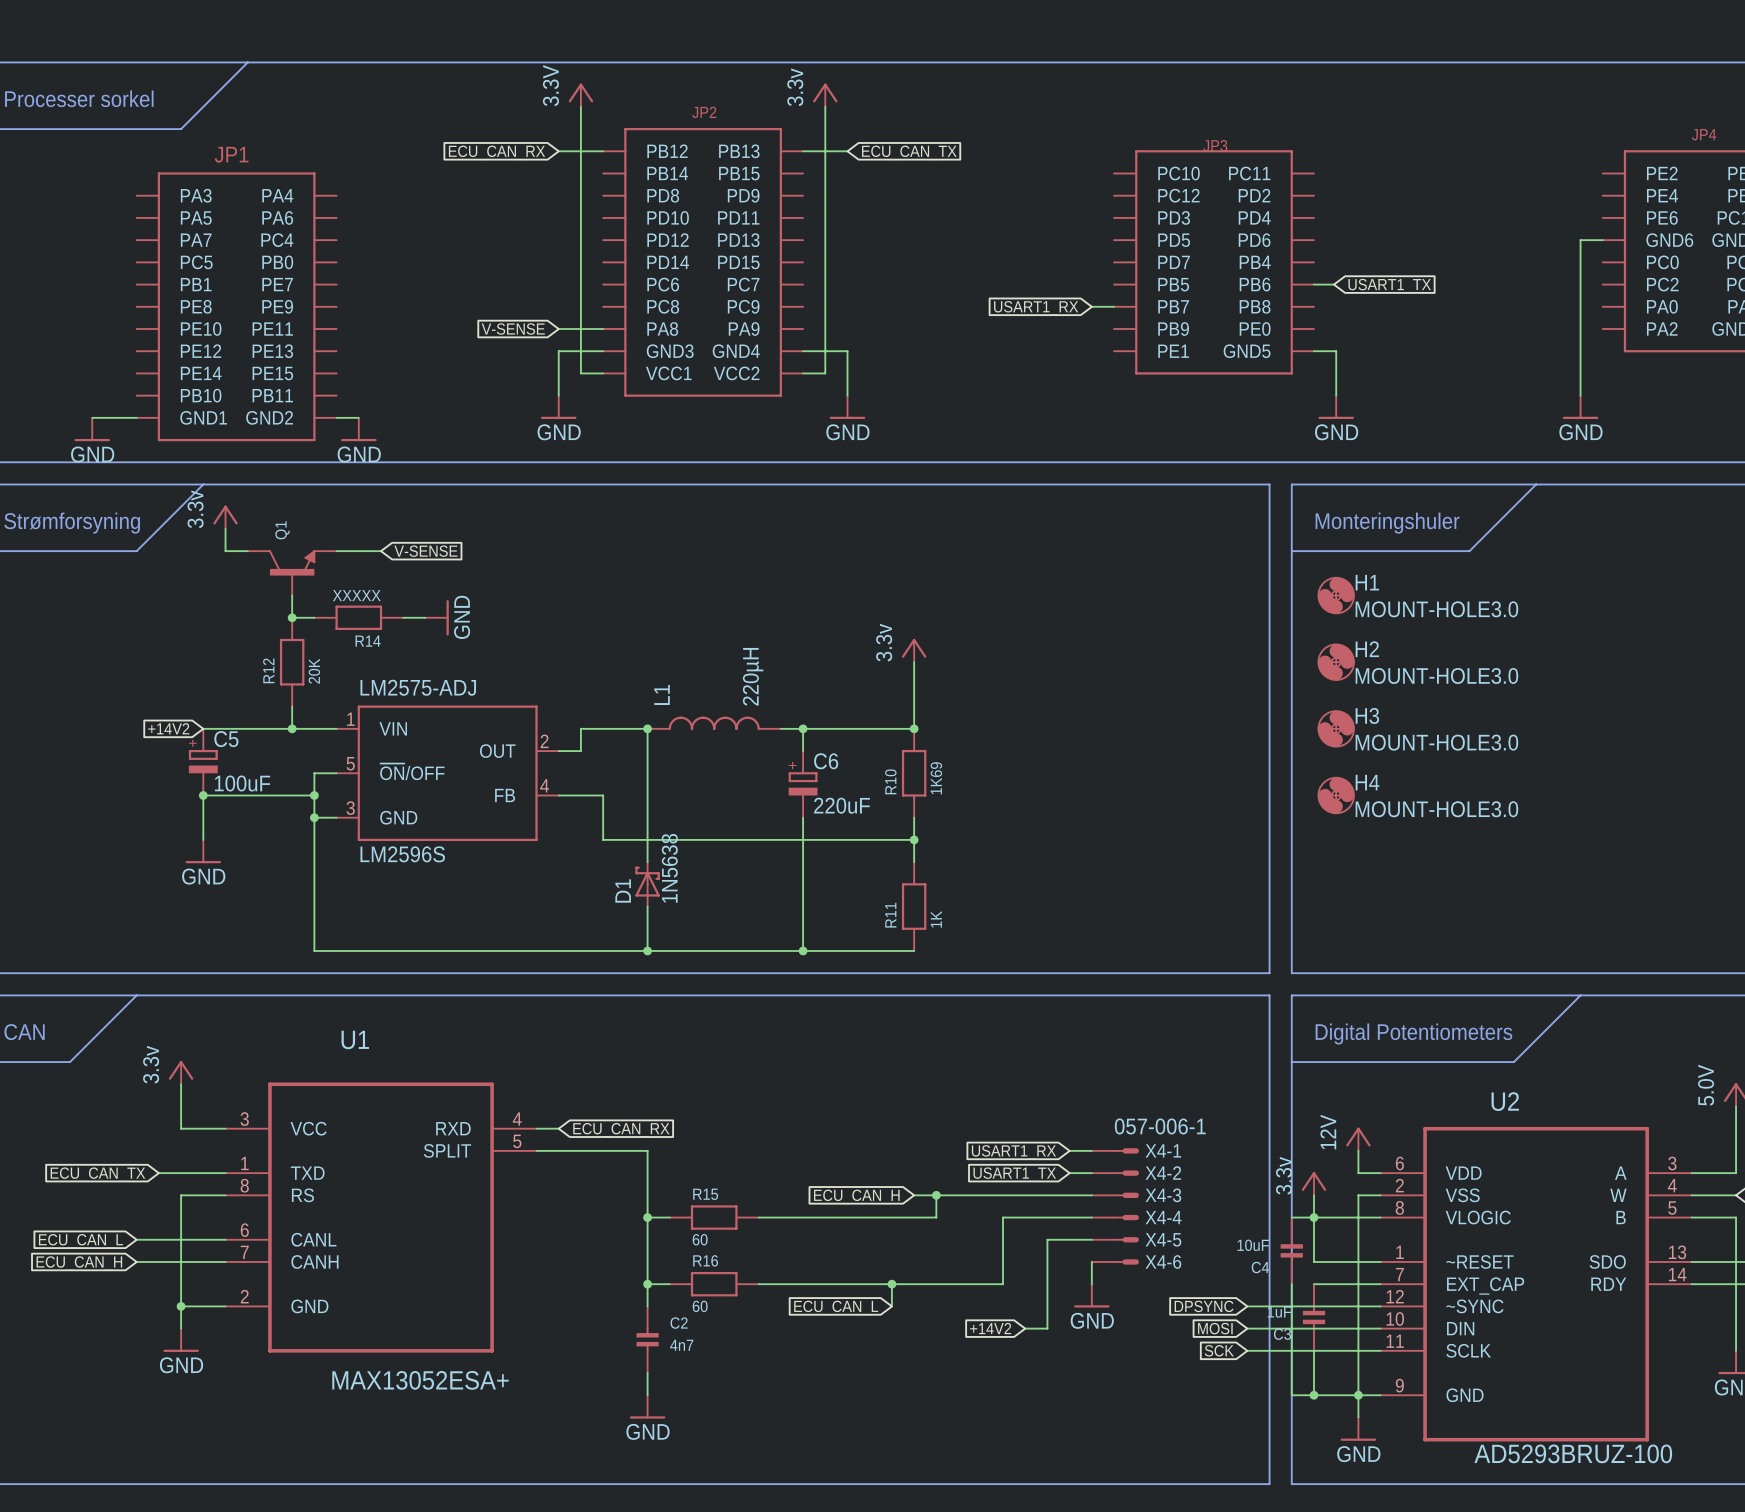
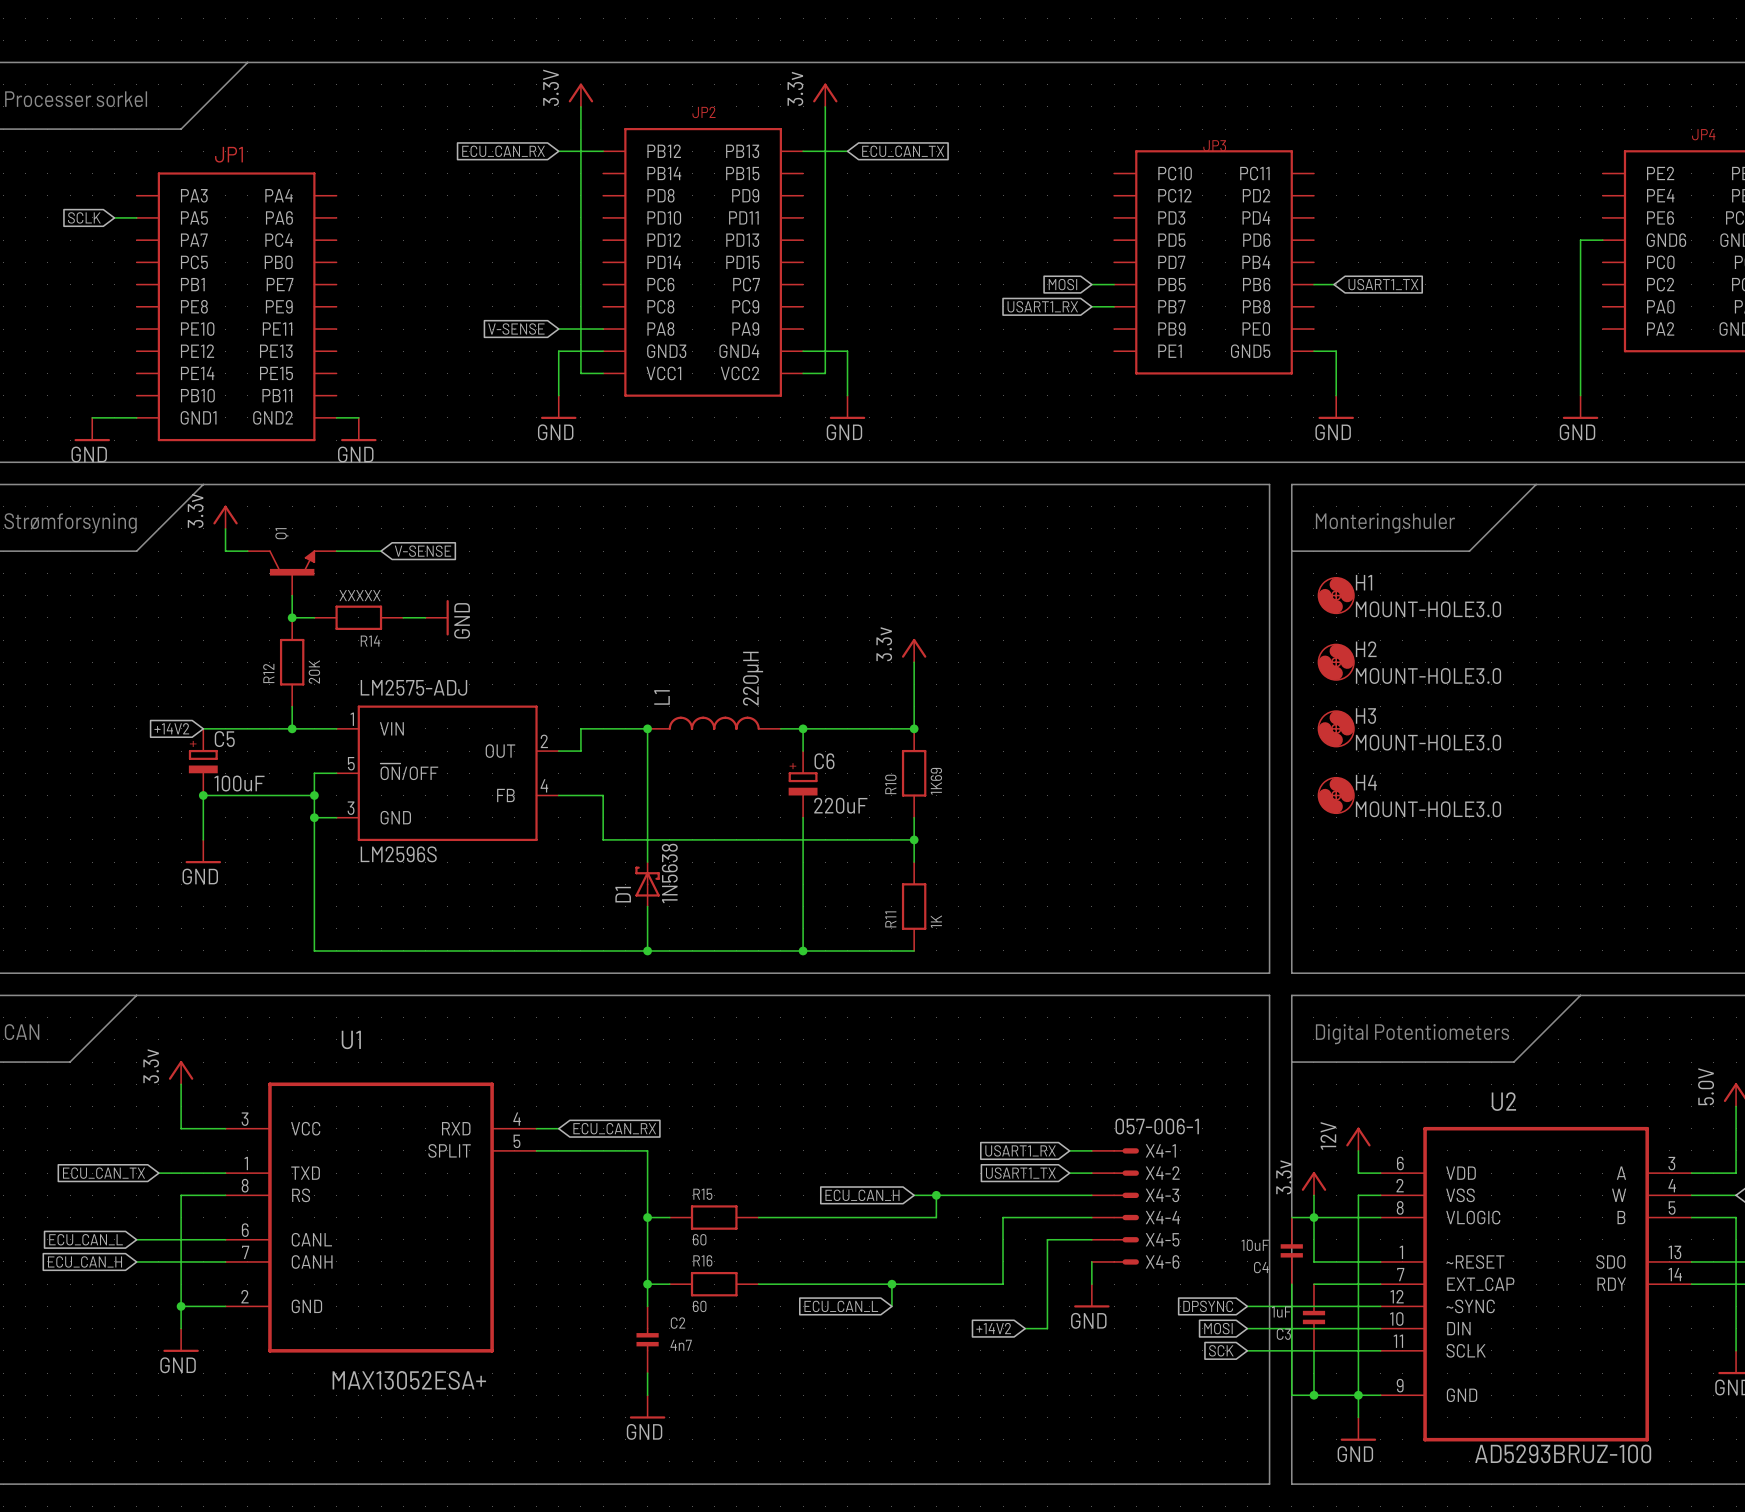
global label: none -> SCLK (84, 217)
wire: none -> (114, 217) (136, 217)
global label: none -> MOSI (1062, 284)
wire: none -> (1091, 284) (1114, 284)

